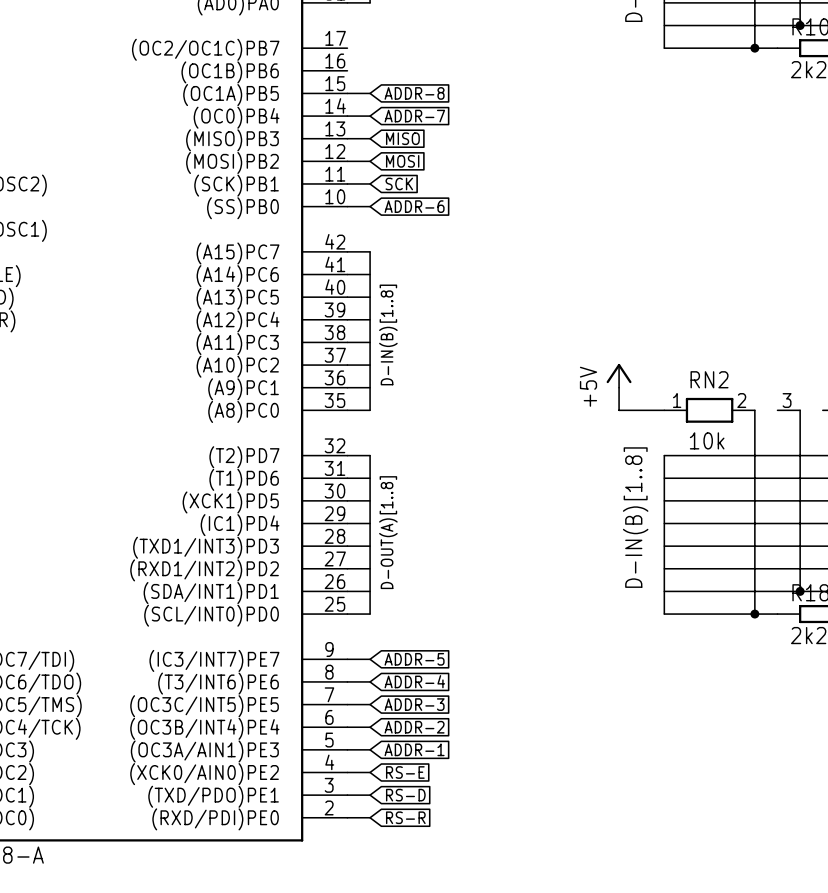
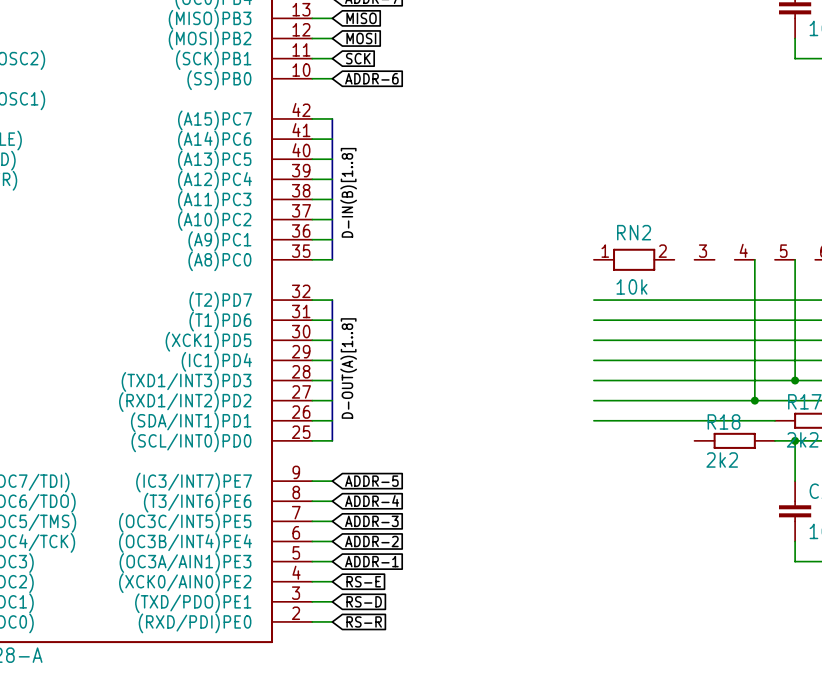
power symbol: +5V (619, 375) -> none
wire: (619, 387) (619, 410) (664, 410) -> none
wire: (754, 410) (754, 614) -> none
wire: (800, 410) (800, 591) -> none
bus: (664, 455) (664, 614) -> none
label: D-IN(B)[1..8] (635, 517) -> none
junction: (800, 591) -> none
wire: (664, 614) (777, 614) -> none
junction: (754, 614) -> none

